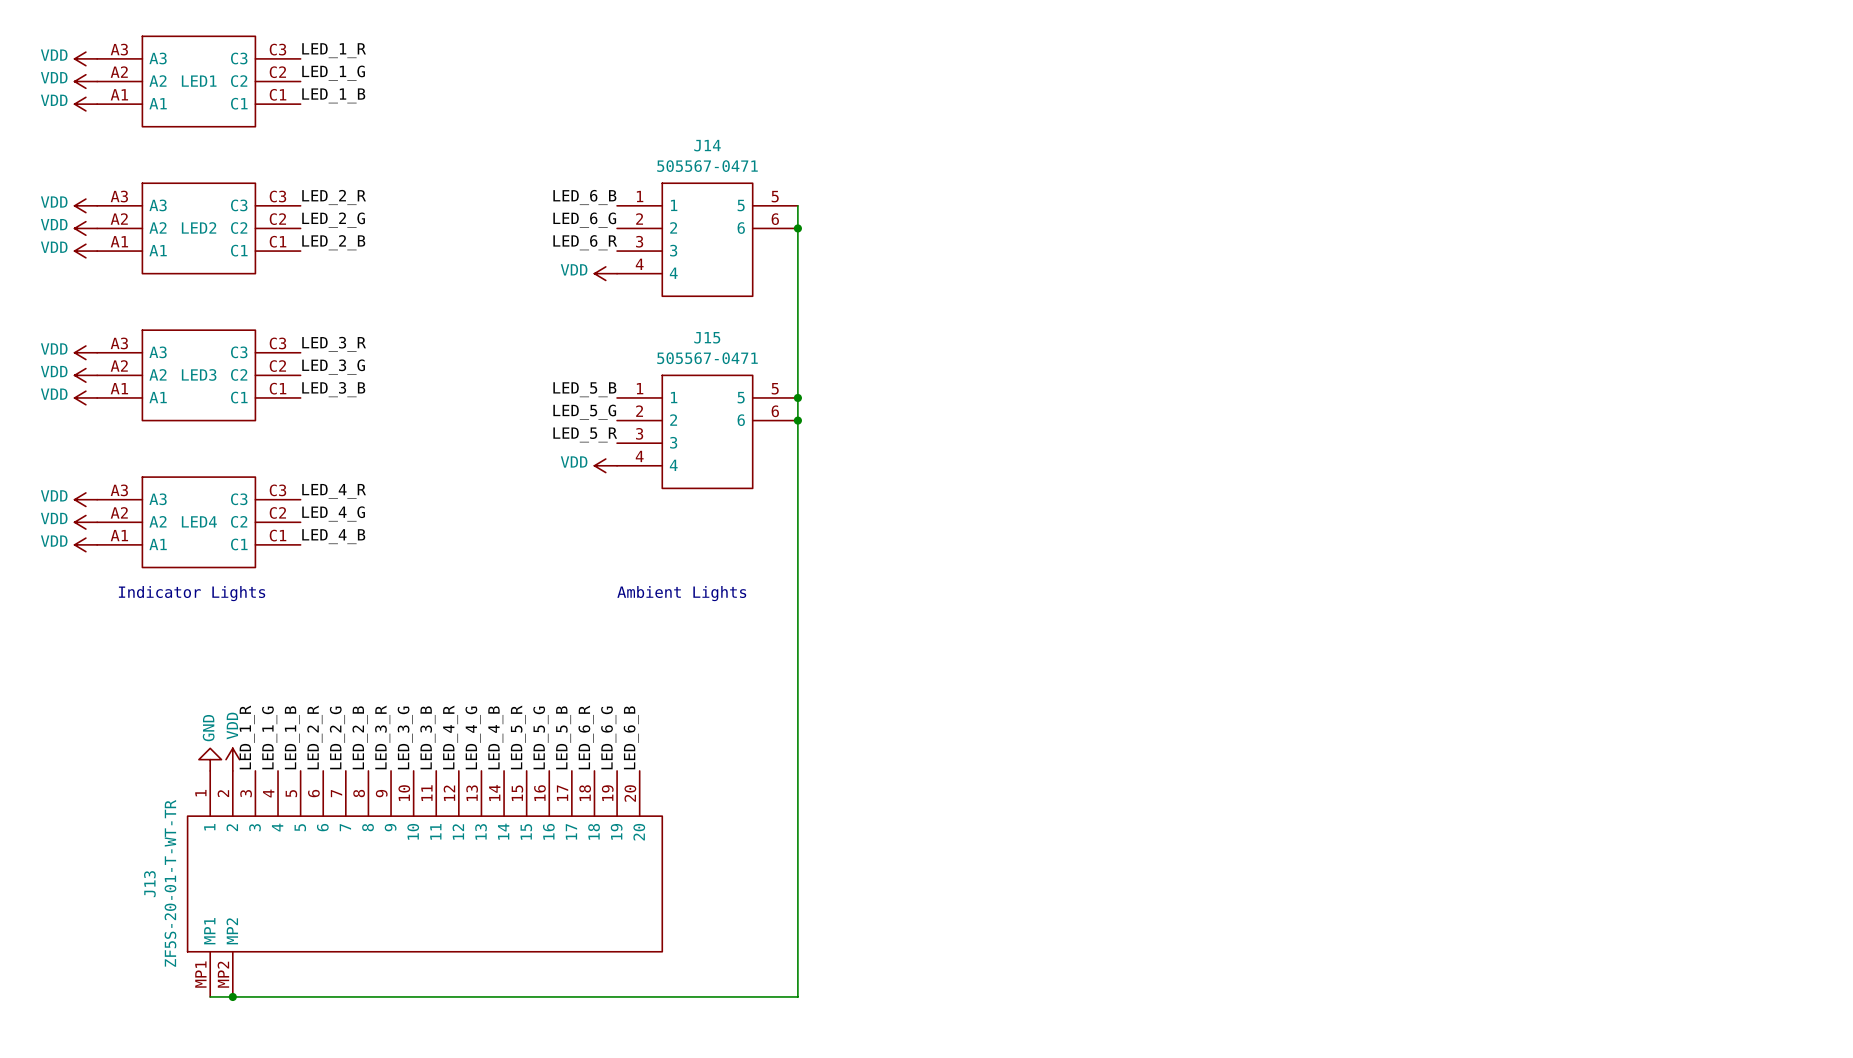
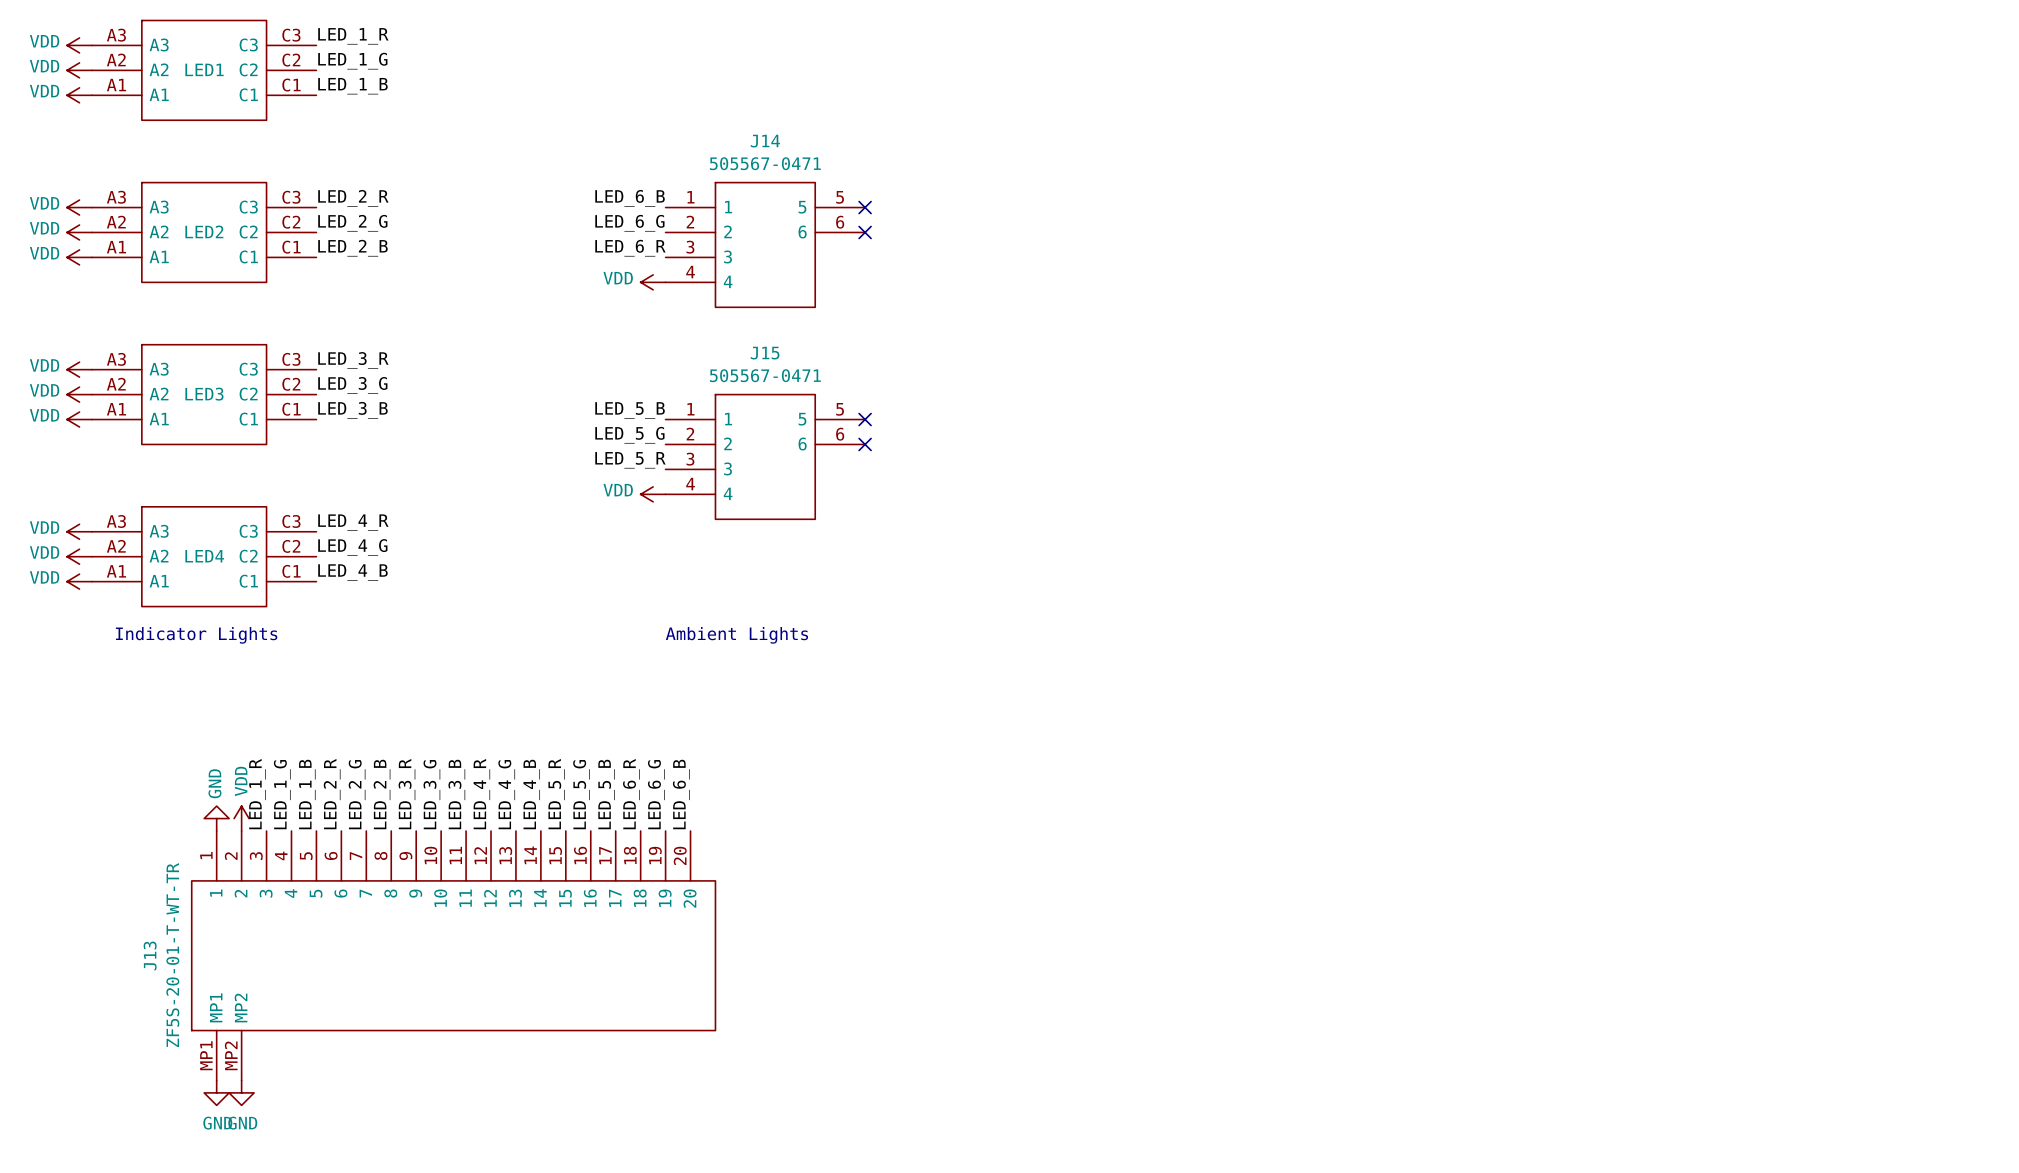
wire: (797, 205) (797, 996) (210, 996) -> none
no-connect mark: none -> (865, 207)
junction: (797, 228) -> none
no-connect mark: none -> (865, 232)
junction: (797, 397) -> none
no-connect mark: none -> (865, 419)
junction: (797, 420) -> none
no-connect mark: none -> (865, 444)
junction: (232, 996) -> none
power symbol: none -> GND (216, 1092)
power symbol: none -> GND (241, 1092)

